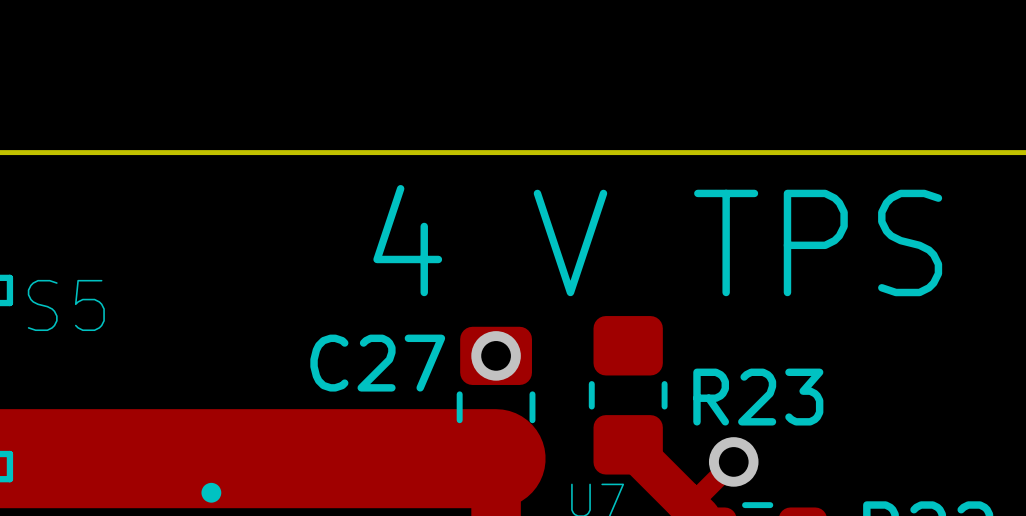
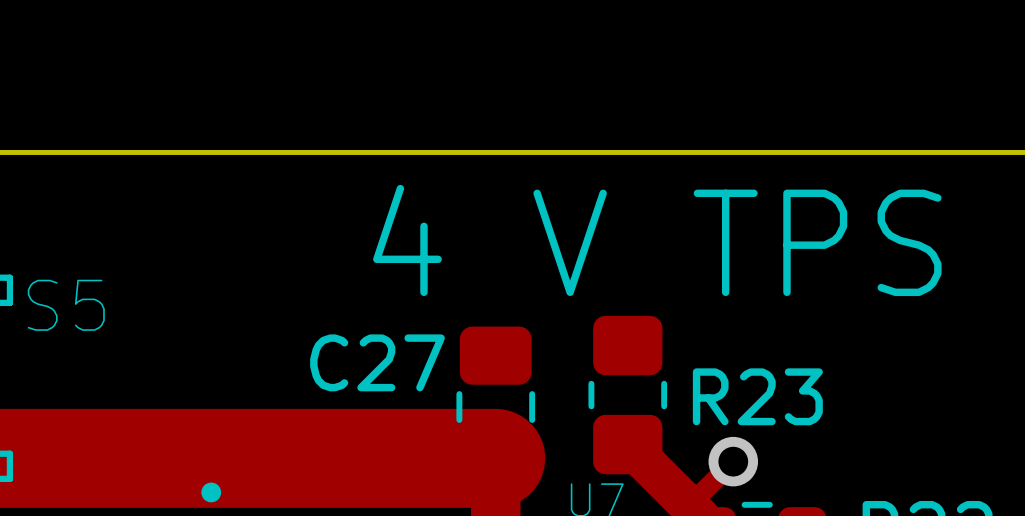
via: (496, 355) -> none

